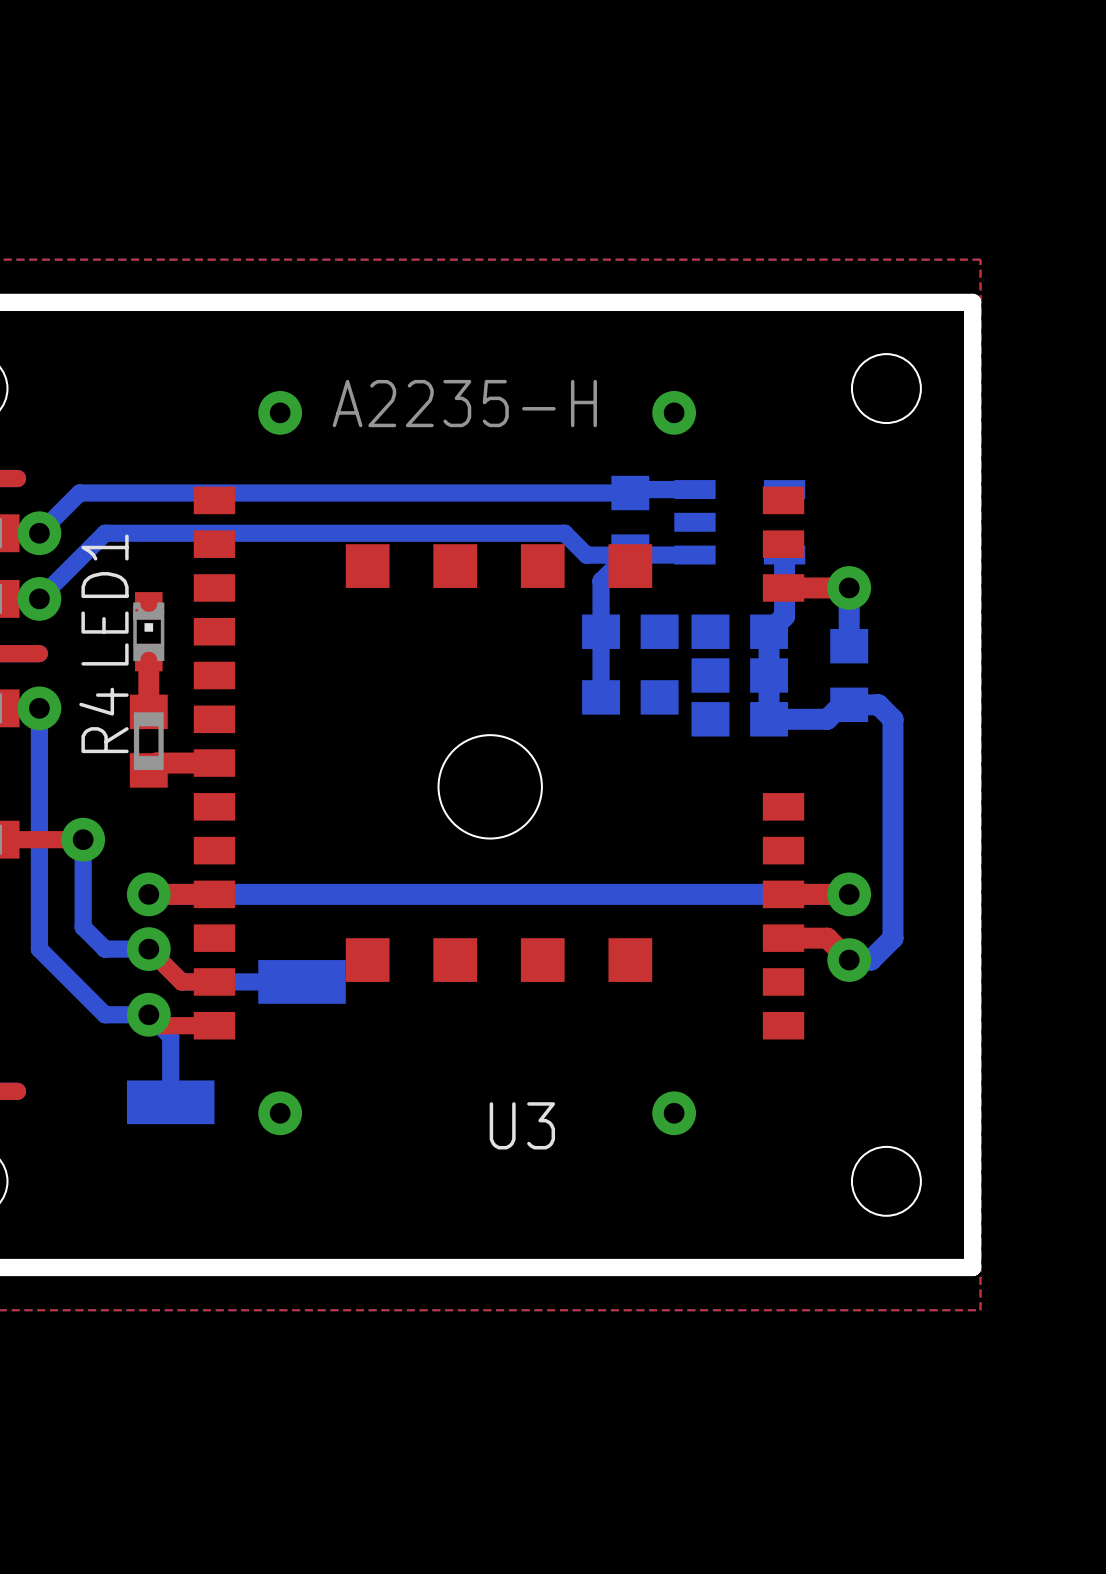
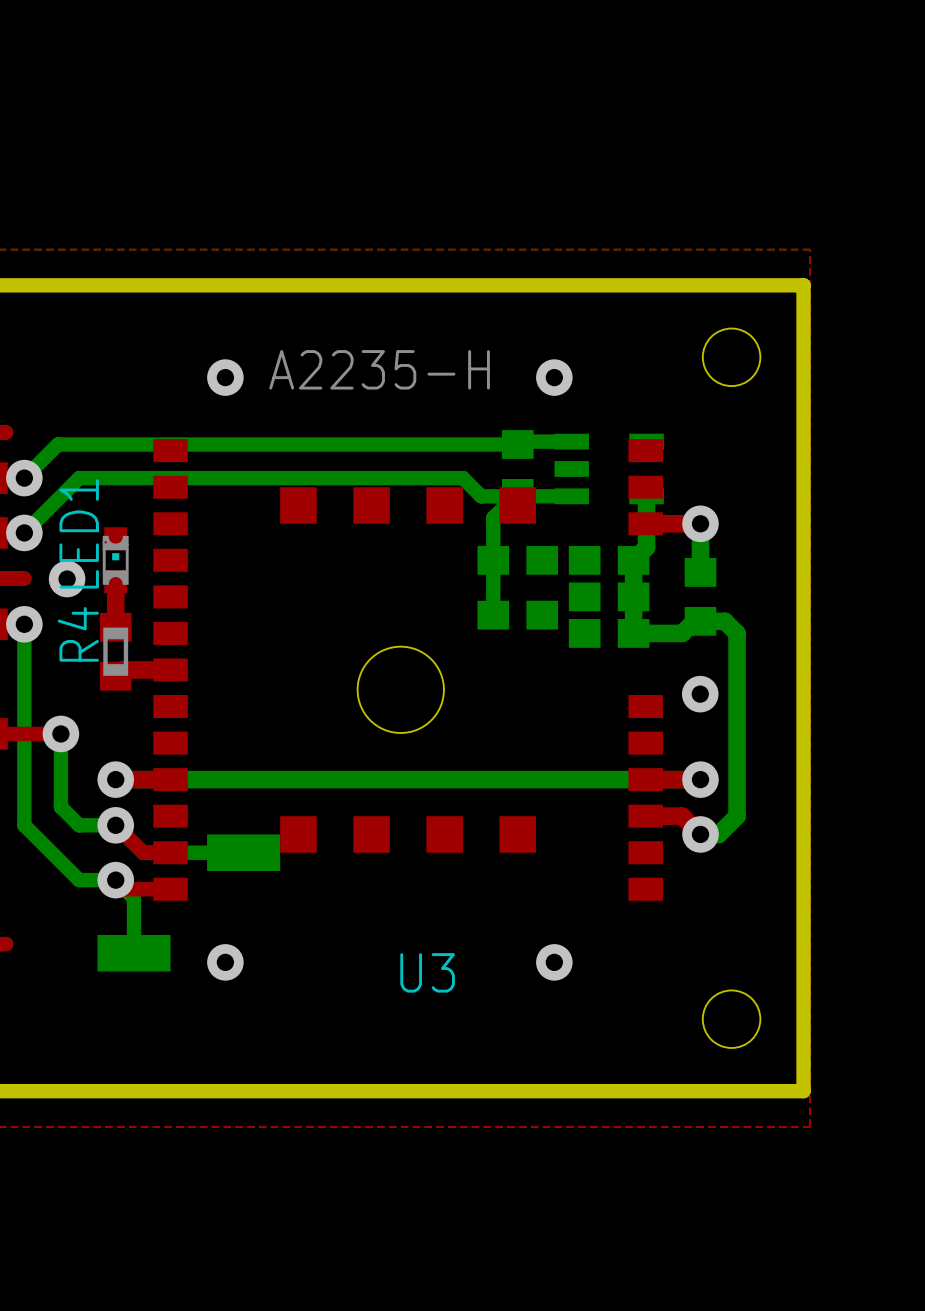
via: none -> (67, 579)
via: none -> (700, 694)

